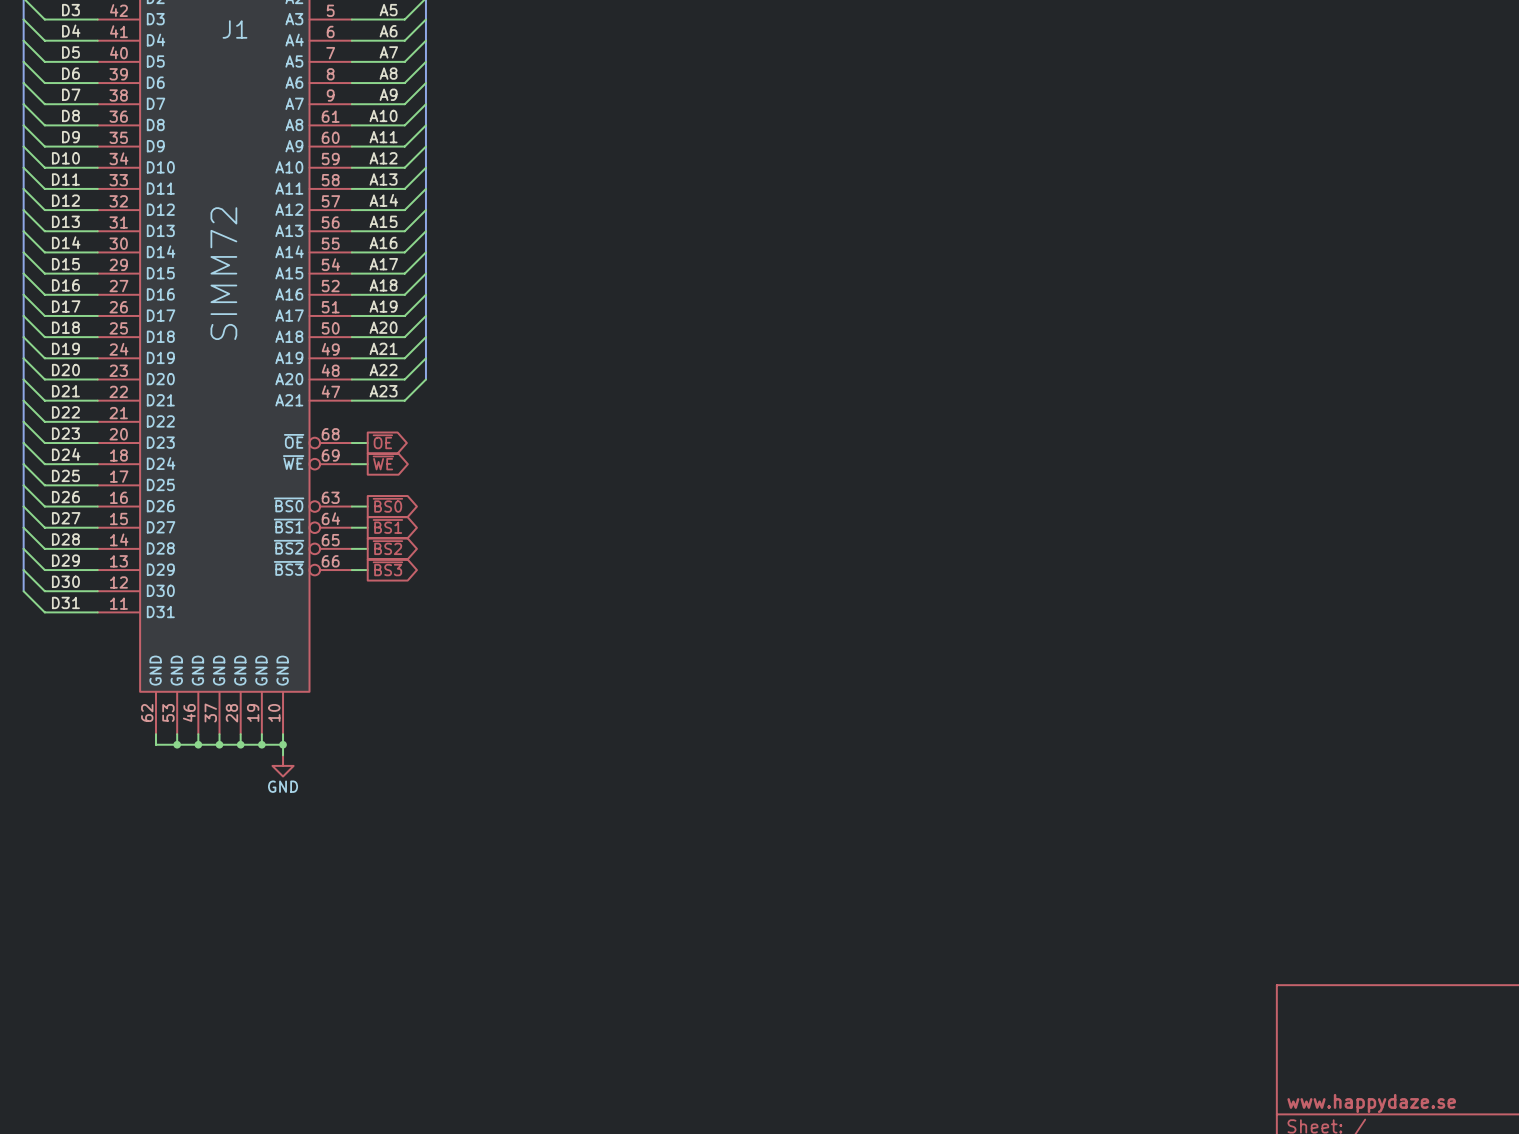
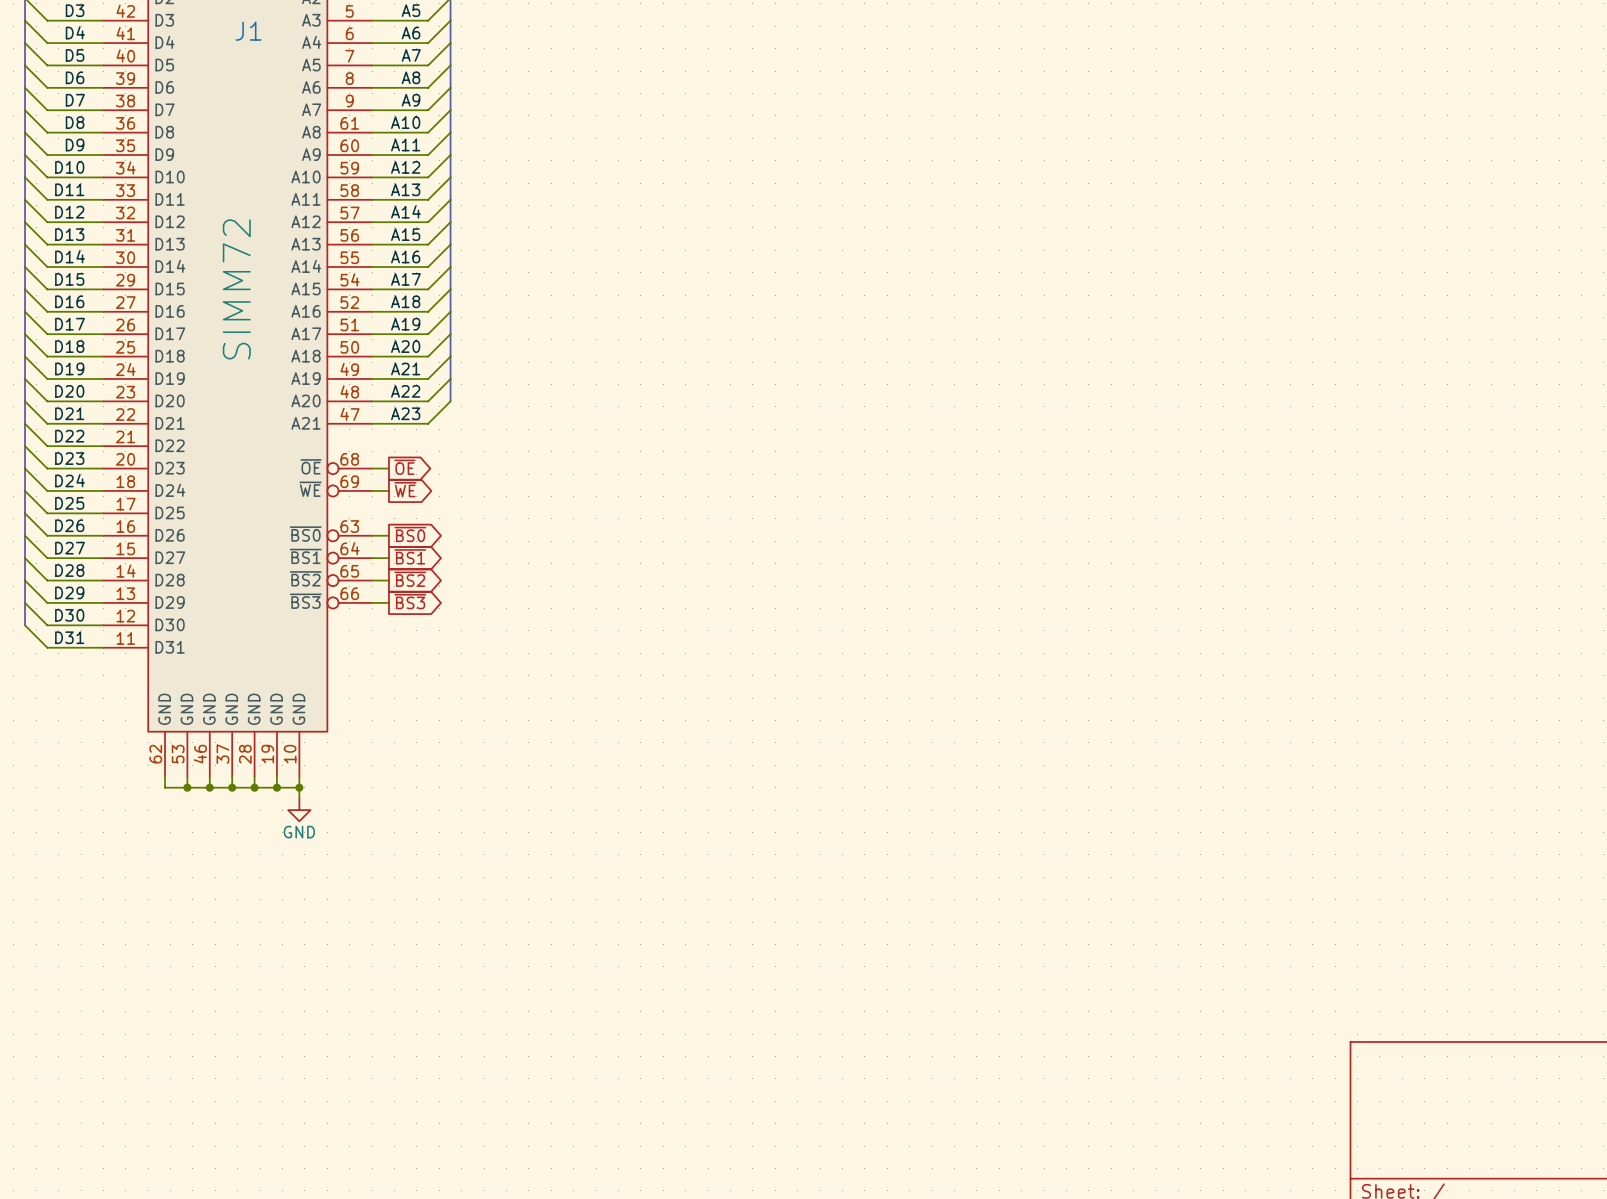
title block: www.happydaze.se (1371, 1103) -> none

